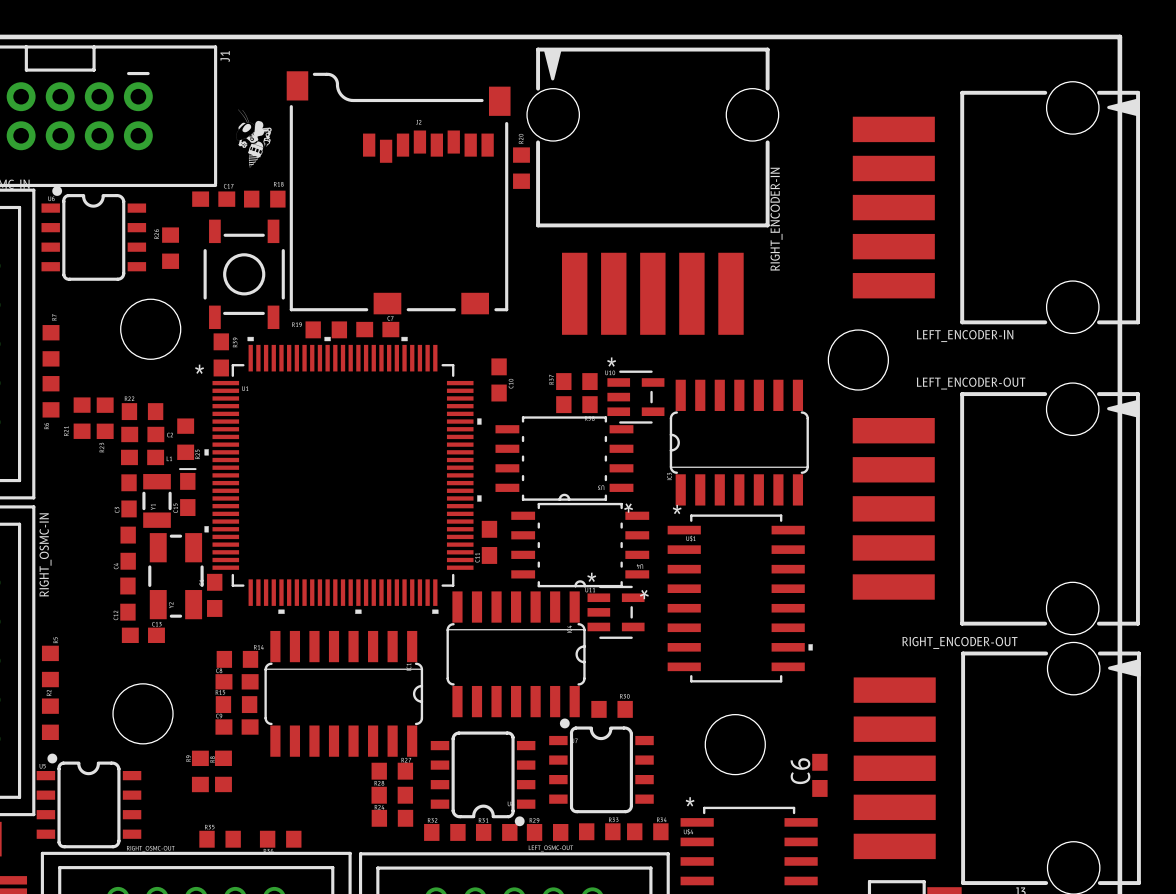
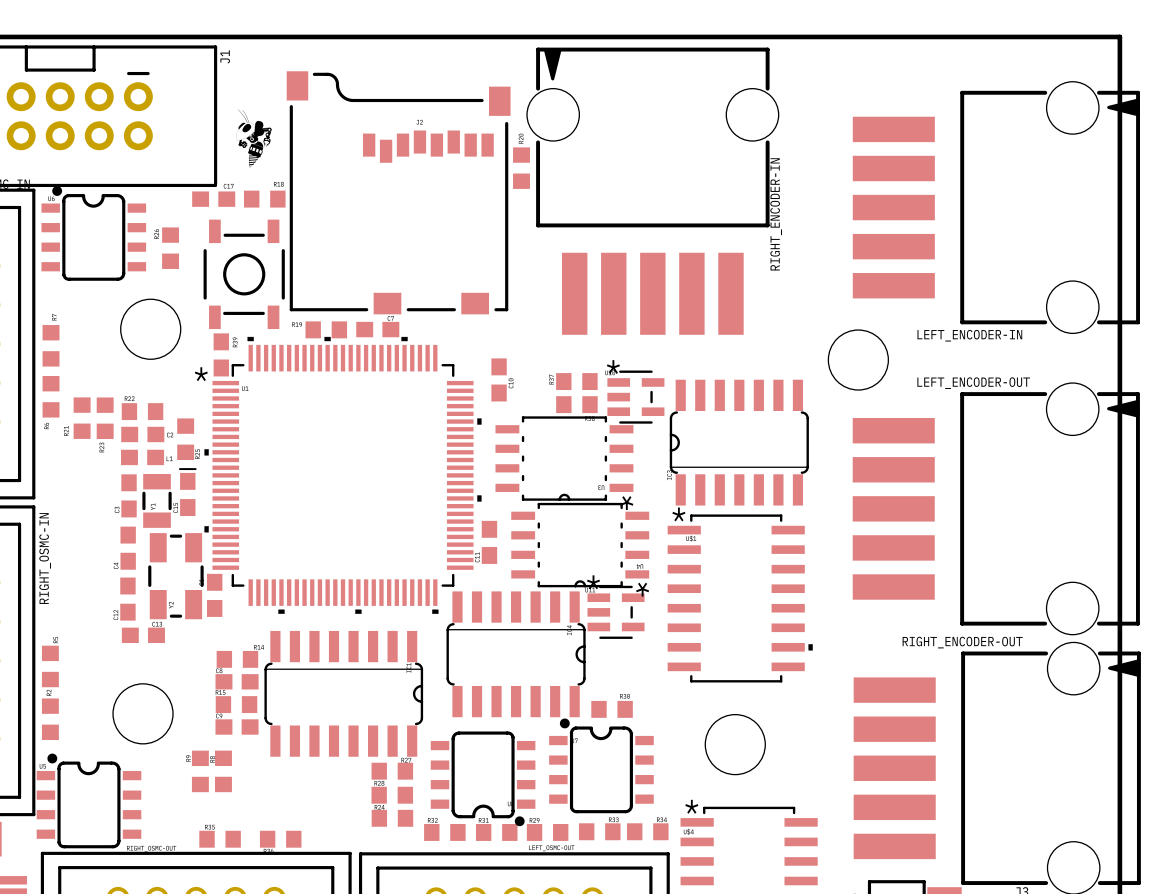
C6: (819, 775) -> none

